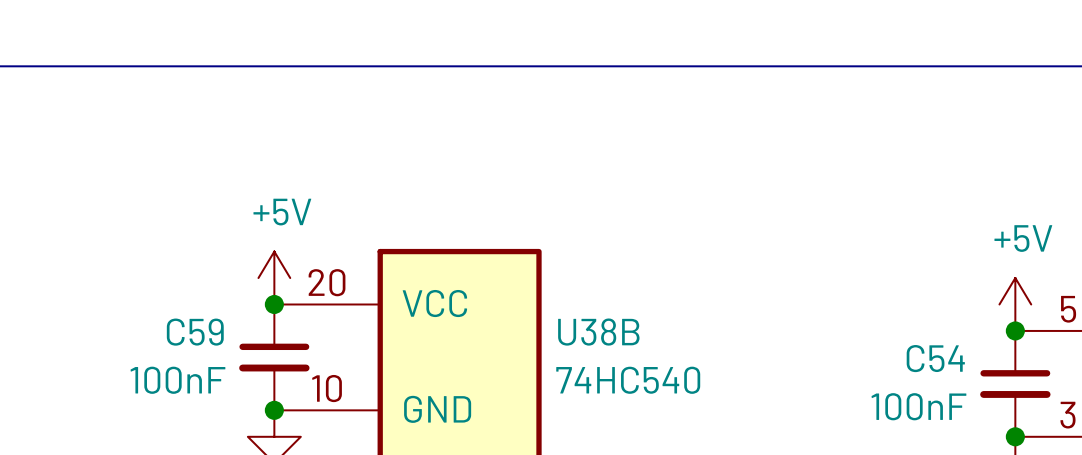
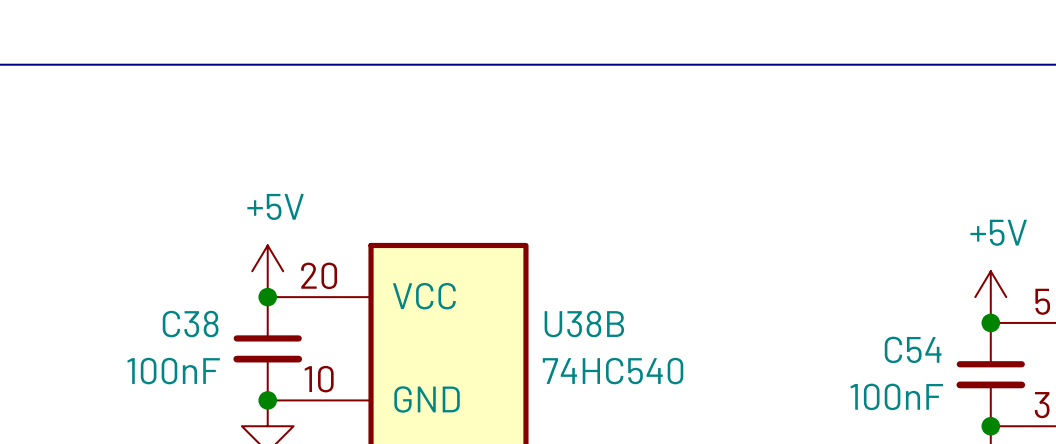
C59 name: C59 (195, 332) -> C38 (190, 324)

